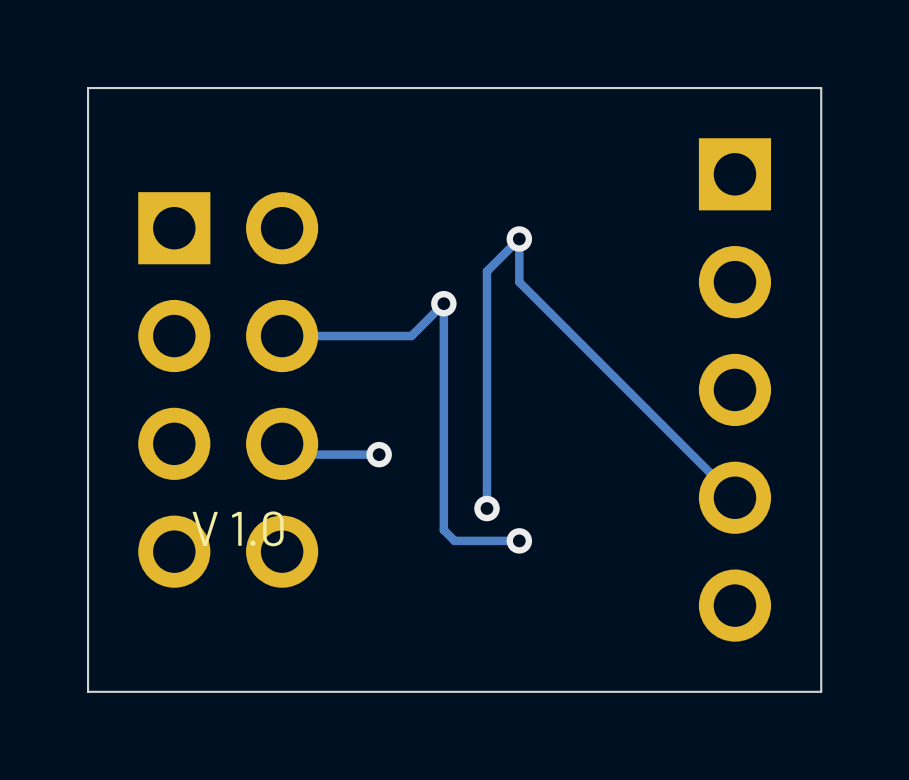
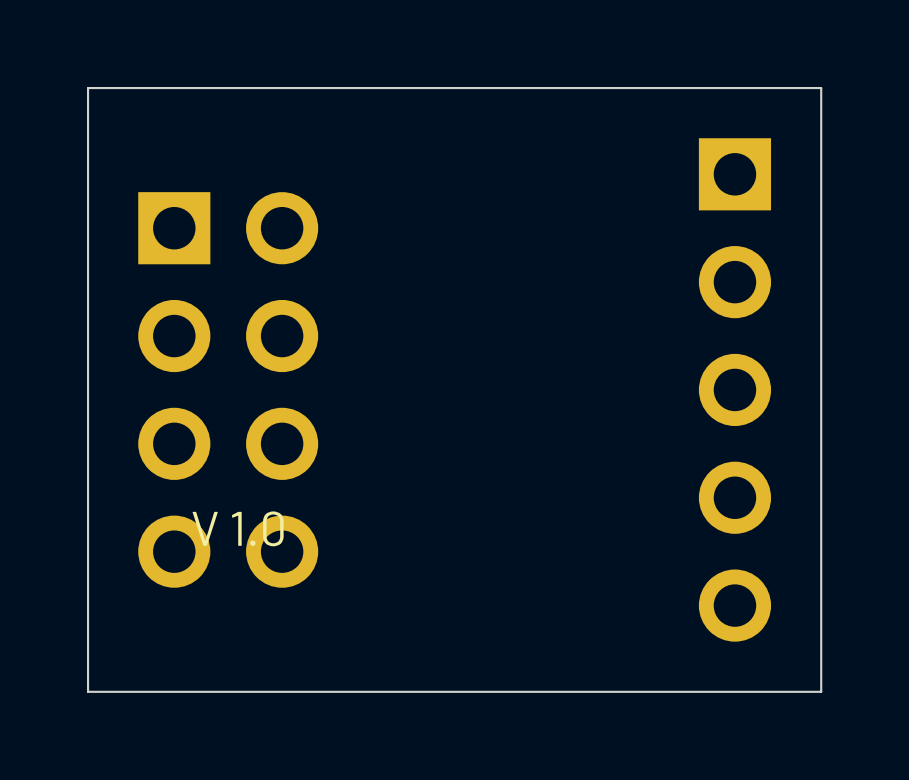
via: (519, 238) -> none
via: (443, 303) -> none
track: (282, 336) (411, 336) (443, 303) (443, 530) (454, 540) (519, 540) -> none
track: (282, 443) (292, 454) (379, 454) -> none
via: (379, 454) -> none
track: (734, 497) (519, 282) (519, 238) (486, 271) (486, 508) -> none
via: (486, 508) -> none
via: (519, 540) -> none

